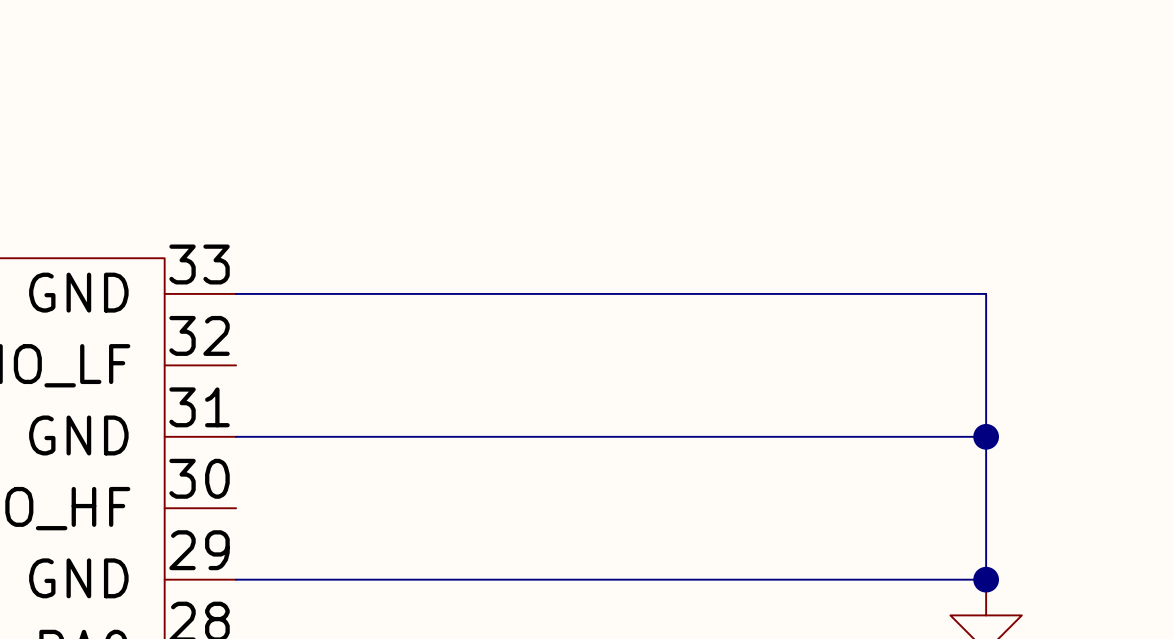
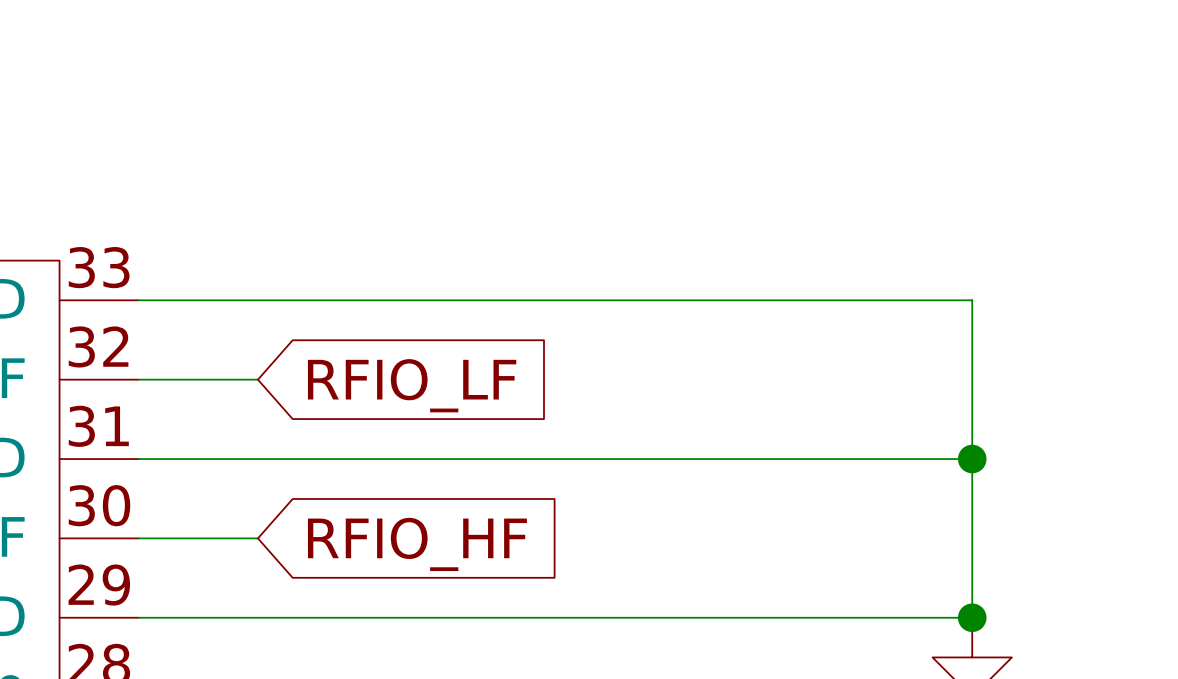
wire: none -> (138, 379) (257, 379)
global label: none -> RFIO_LF (412, 385)
wire: none -> (138, 538) (257, 538)
global label: none -> RFIO_HF (417, 544)

